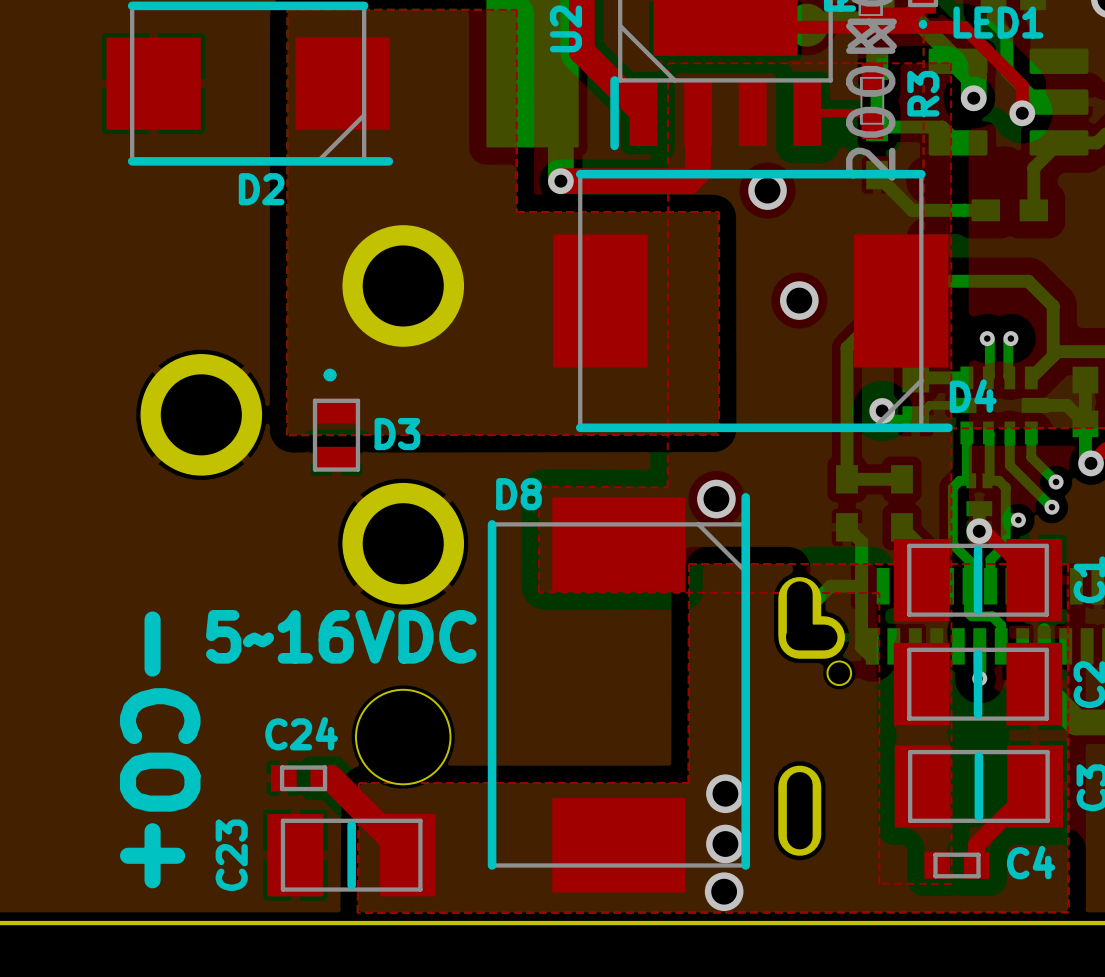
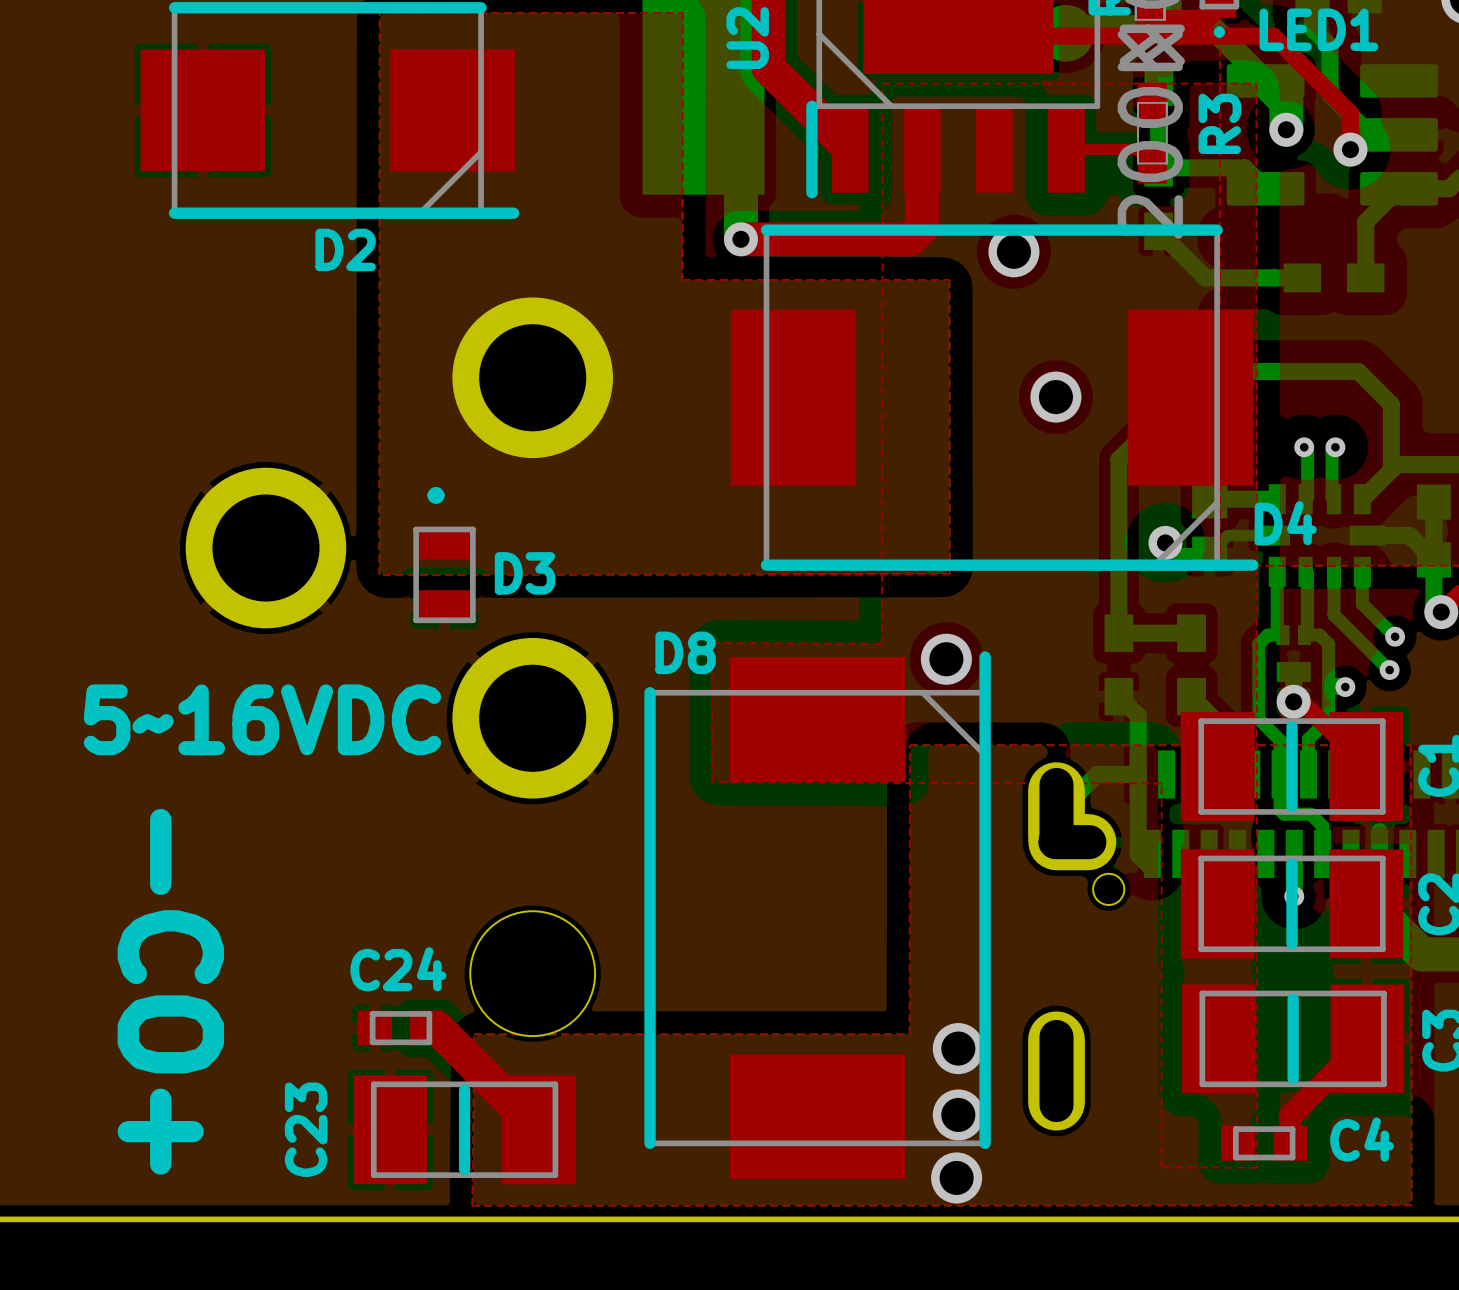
text position: 5~16VDC (341, 636) -> 5~16VDC (262, 719)
text position: -CO+ (160, 749) -> -CO+ (170, 991)

